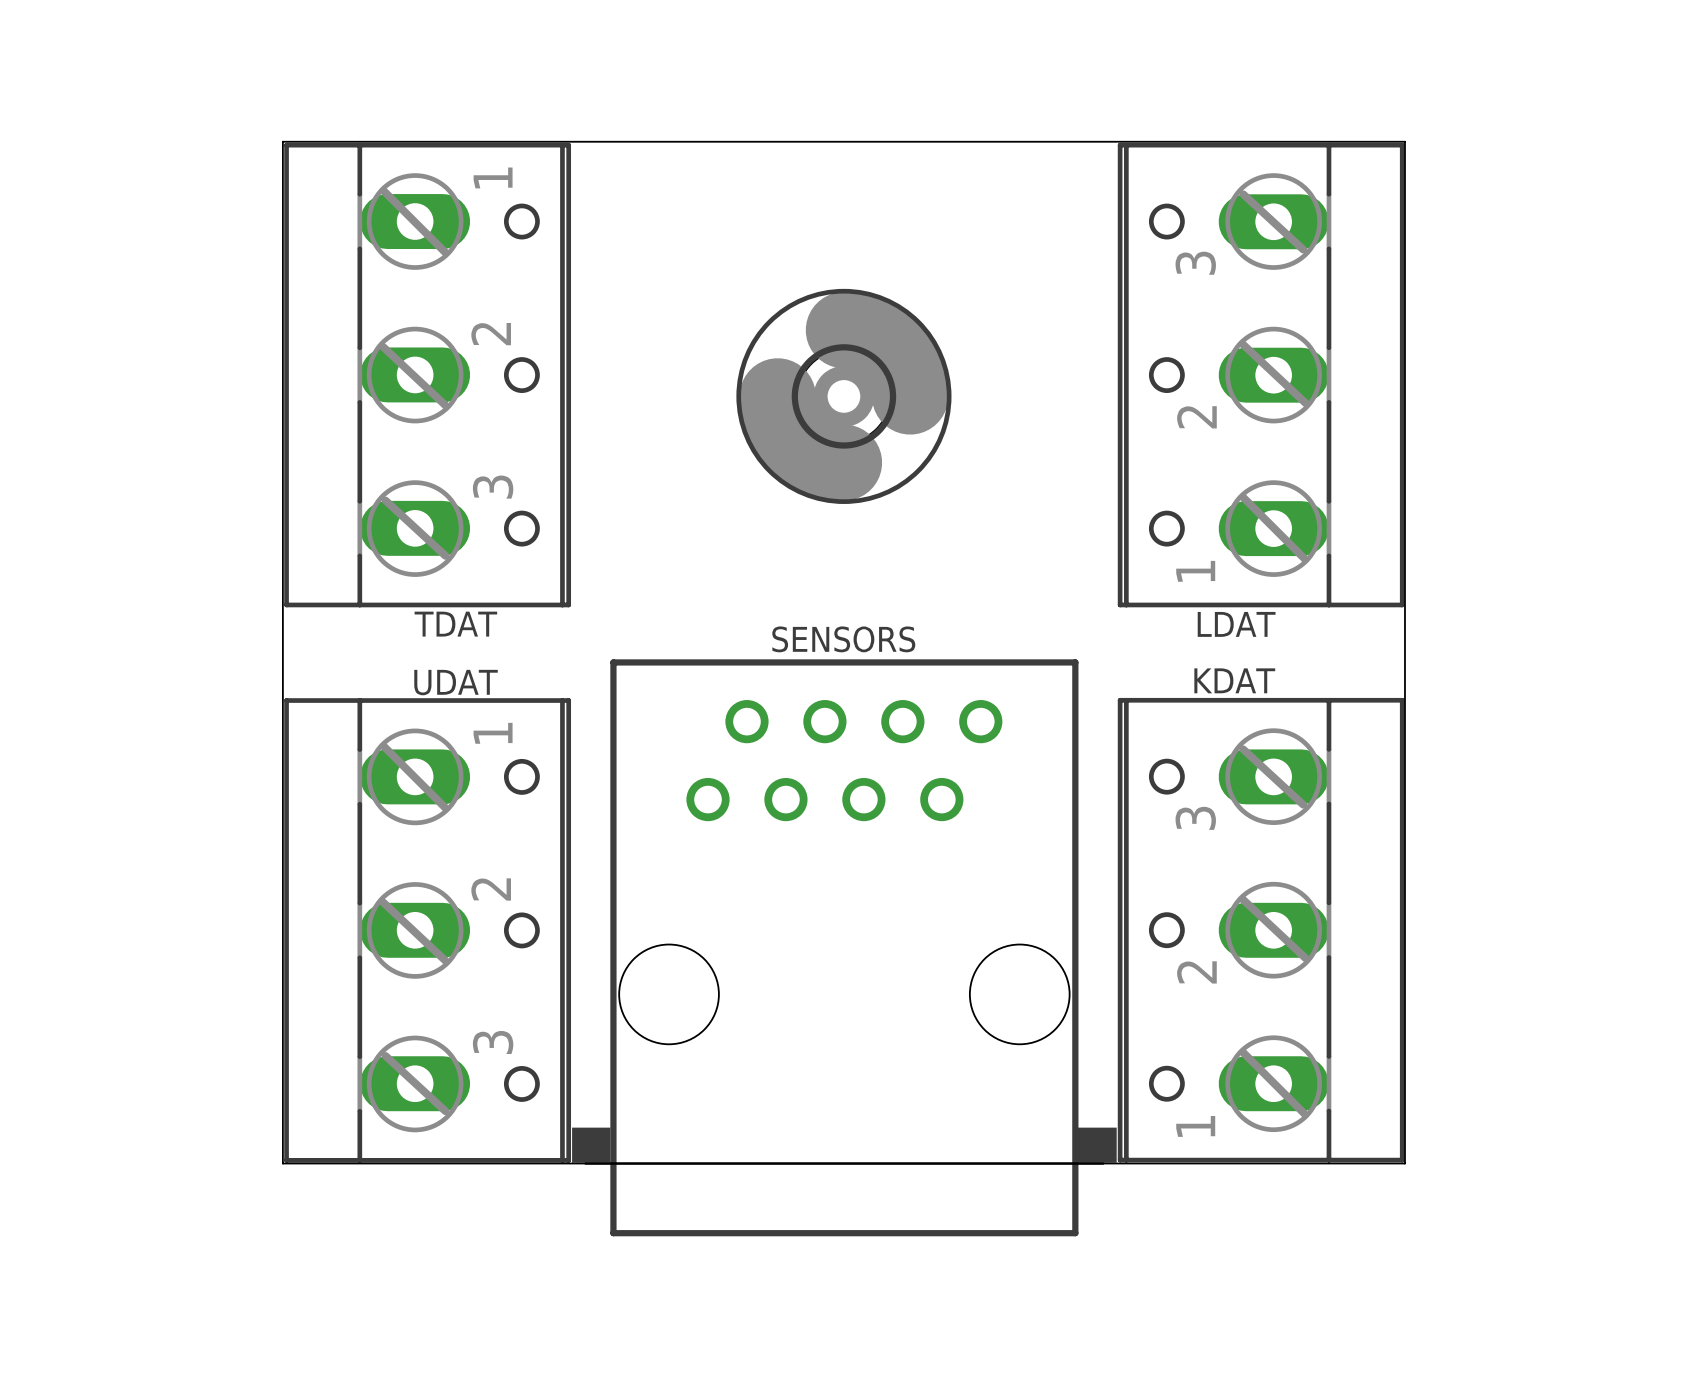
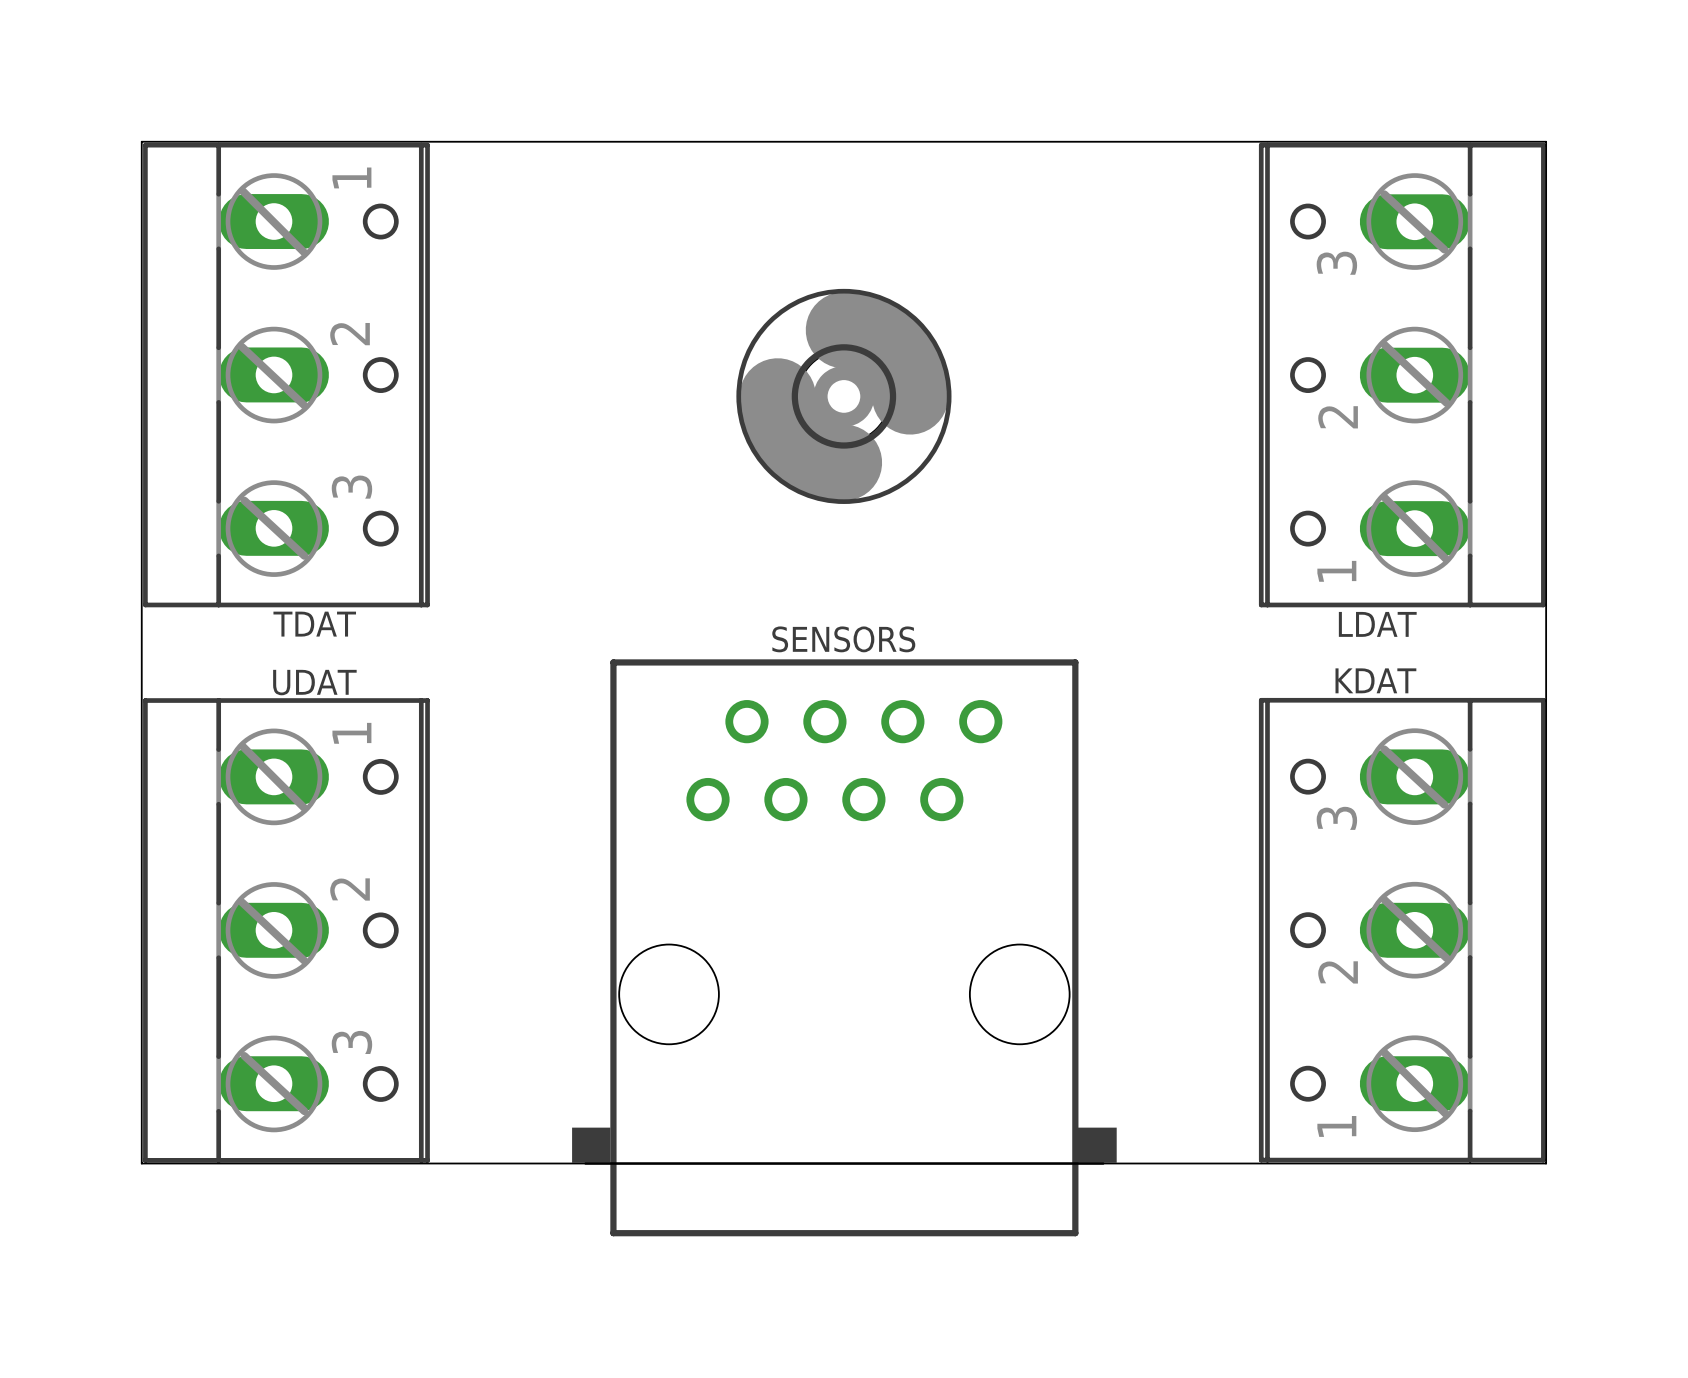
board edge: (282, 141) (282, 1163) -> (282, 141) (141, 141) (141, 1163) (282, 1163)
board edge: (1404, 141) (1404, 1163) -> (1404, 141) (1546, 141) (1546, 1163) (1404, 1163)
TDAT position: (427, 375) -> (286, 375)
LDAT position: (1261, 375) -> (1402, 375)
UDAT position: (427, 930) -> (286, 930)
KDAT position: (1261, 930) -> (1402, 930)

